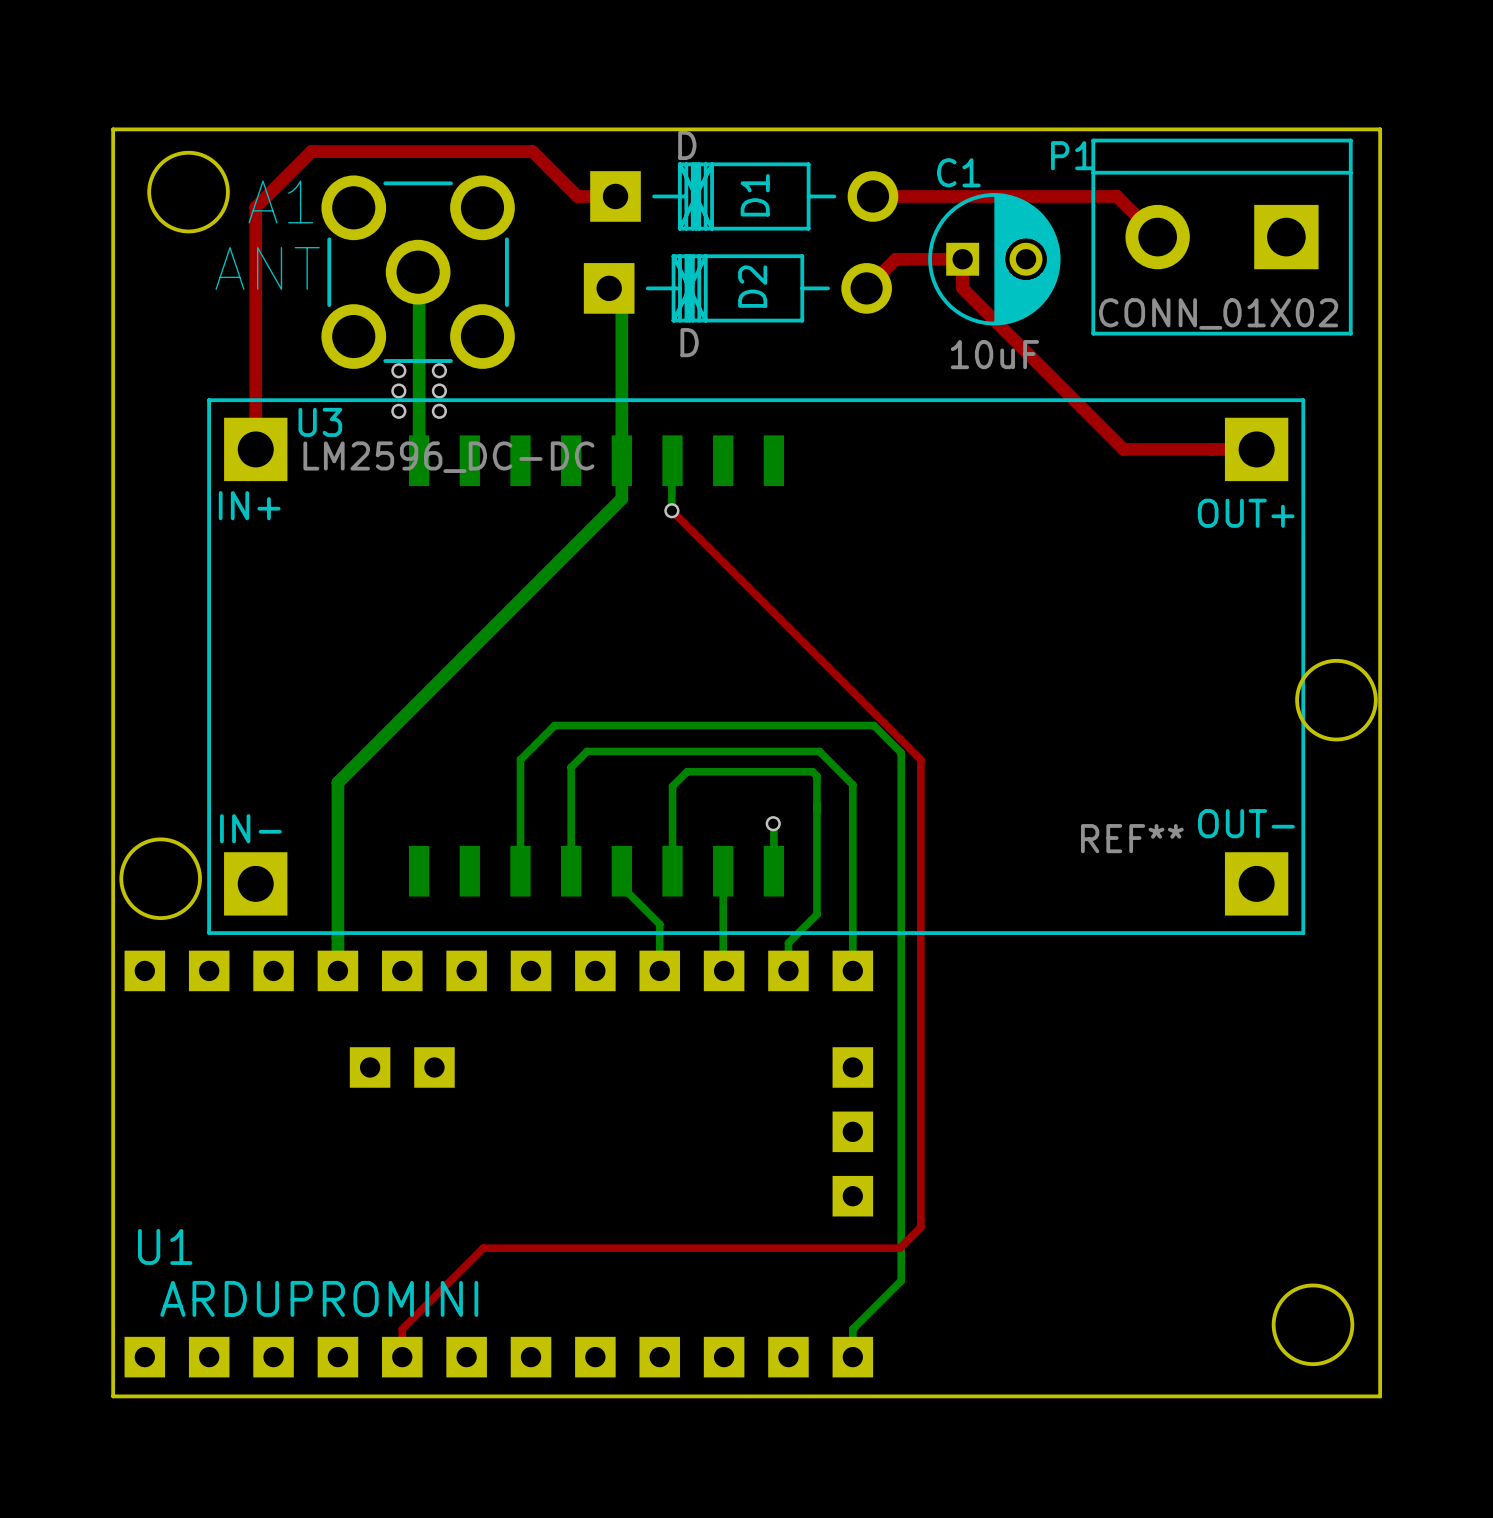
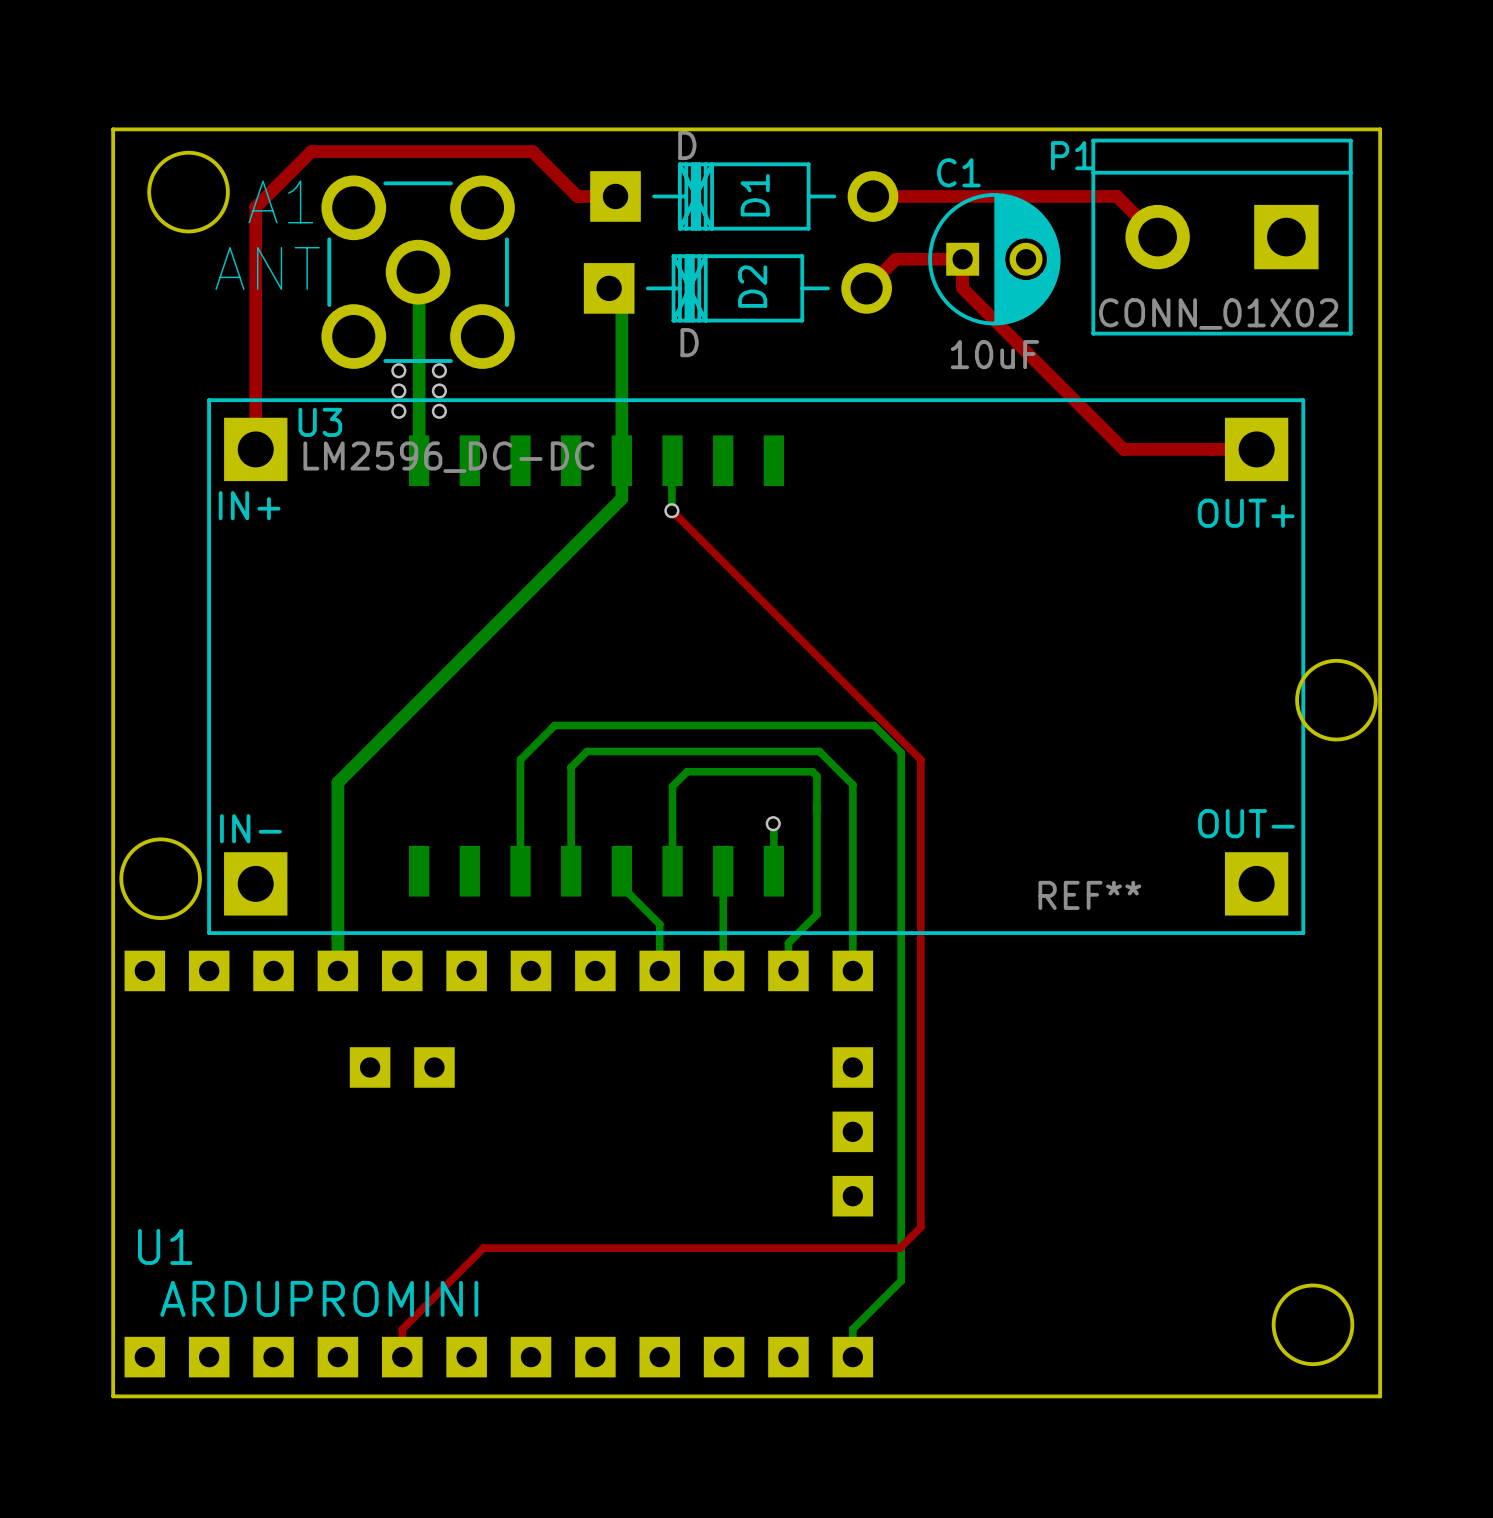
REF** position: (1132, 838) -> (1089, 895)

